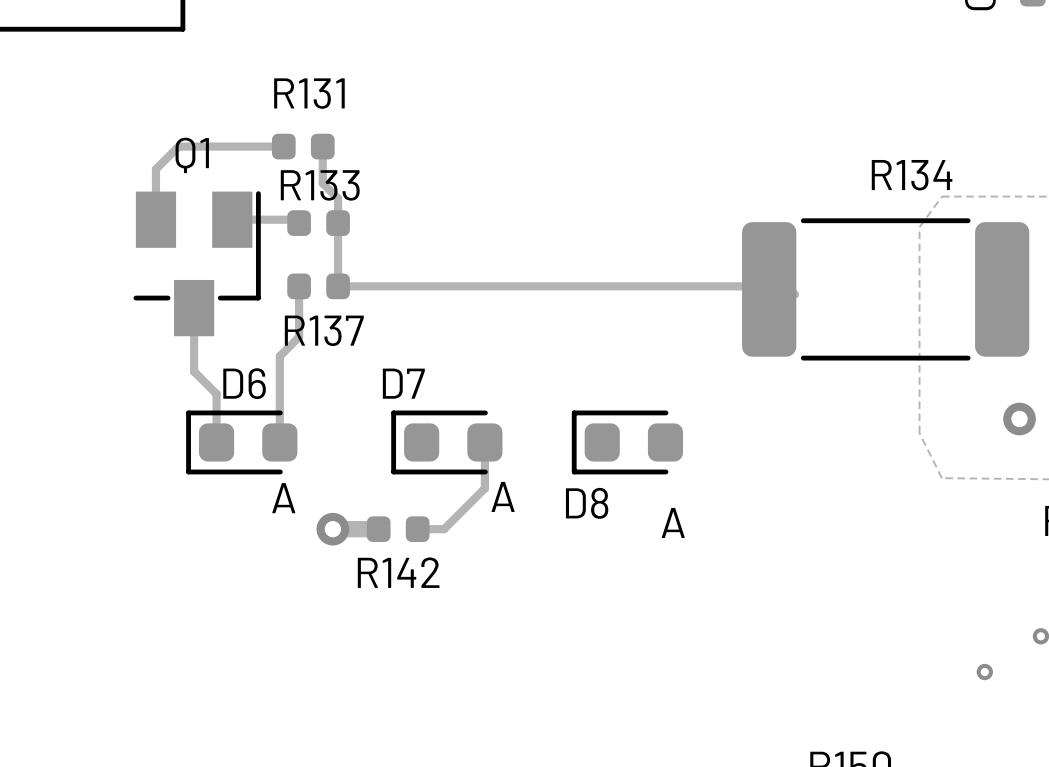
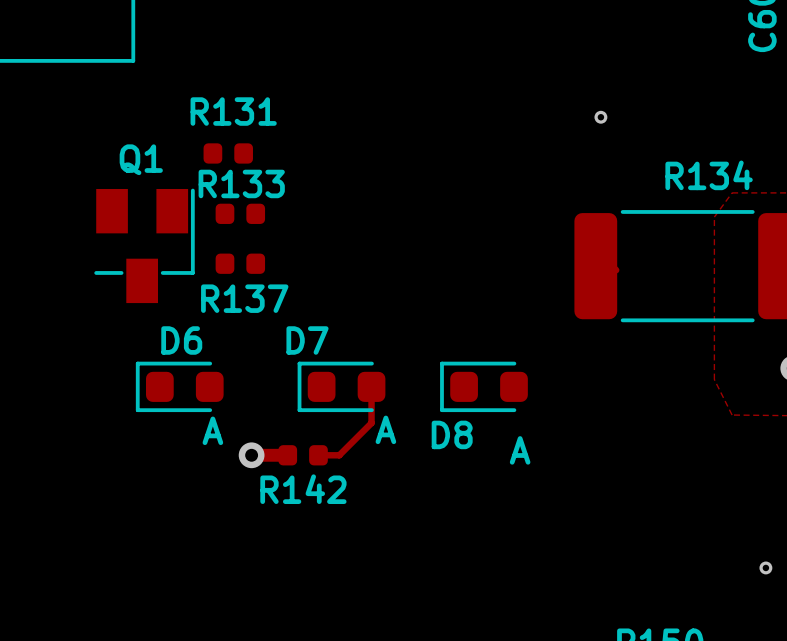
via: none -> (600, 117)
track: (283, 146) (178, 146) (155, 169) (155, 219) -> none
track: (322, 146) (322, 183) (338, 198) (338, 286) (766, 286) (769, 289) -> none
track: (232, 219) (295, 219) (299, 223) -> none
track: (299, 286) (299, 336) (279, 356) (279, 442) -> none
track: (194, 308) (194, 371) (216, 394) (216, 442) -> none

